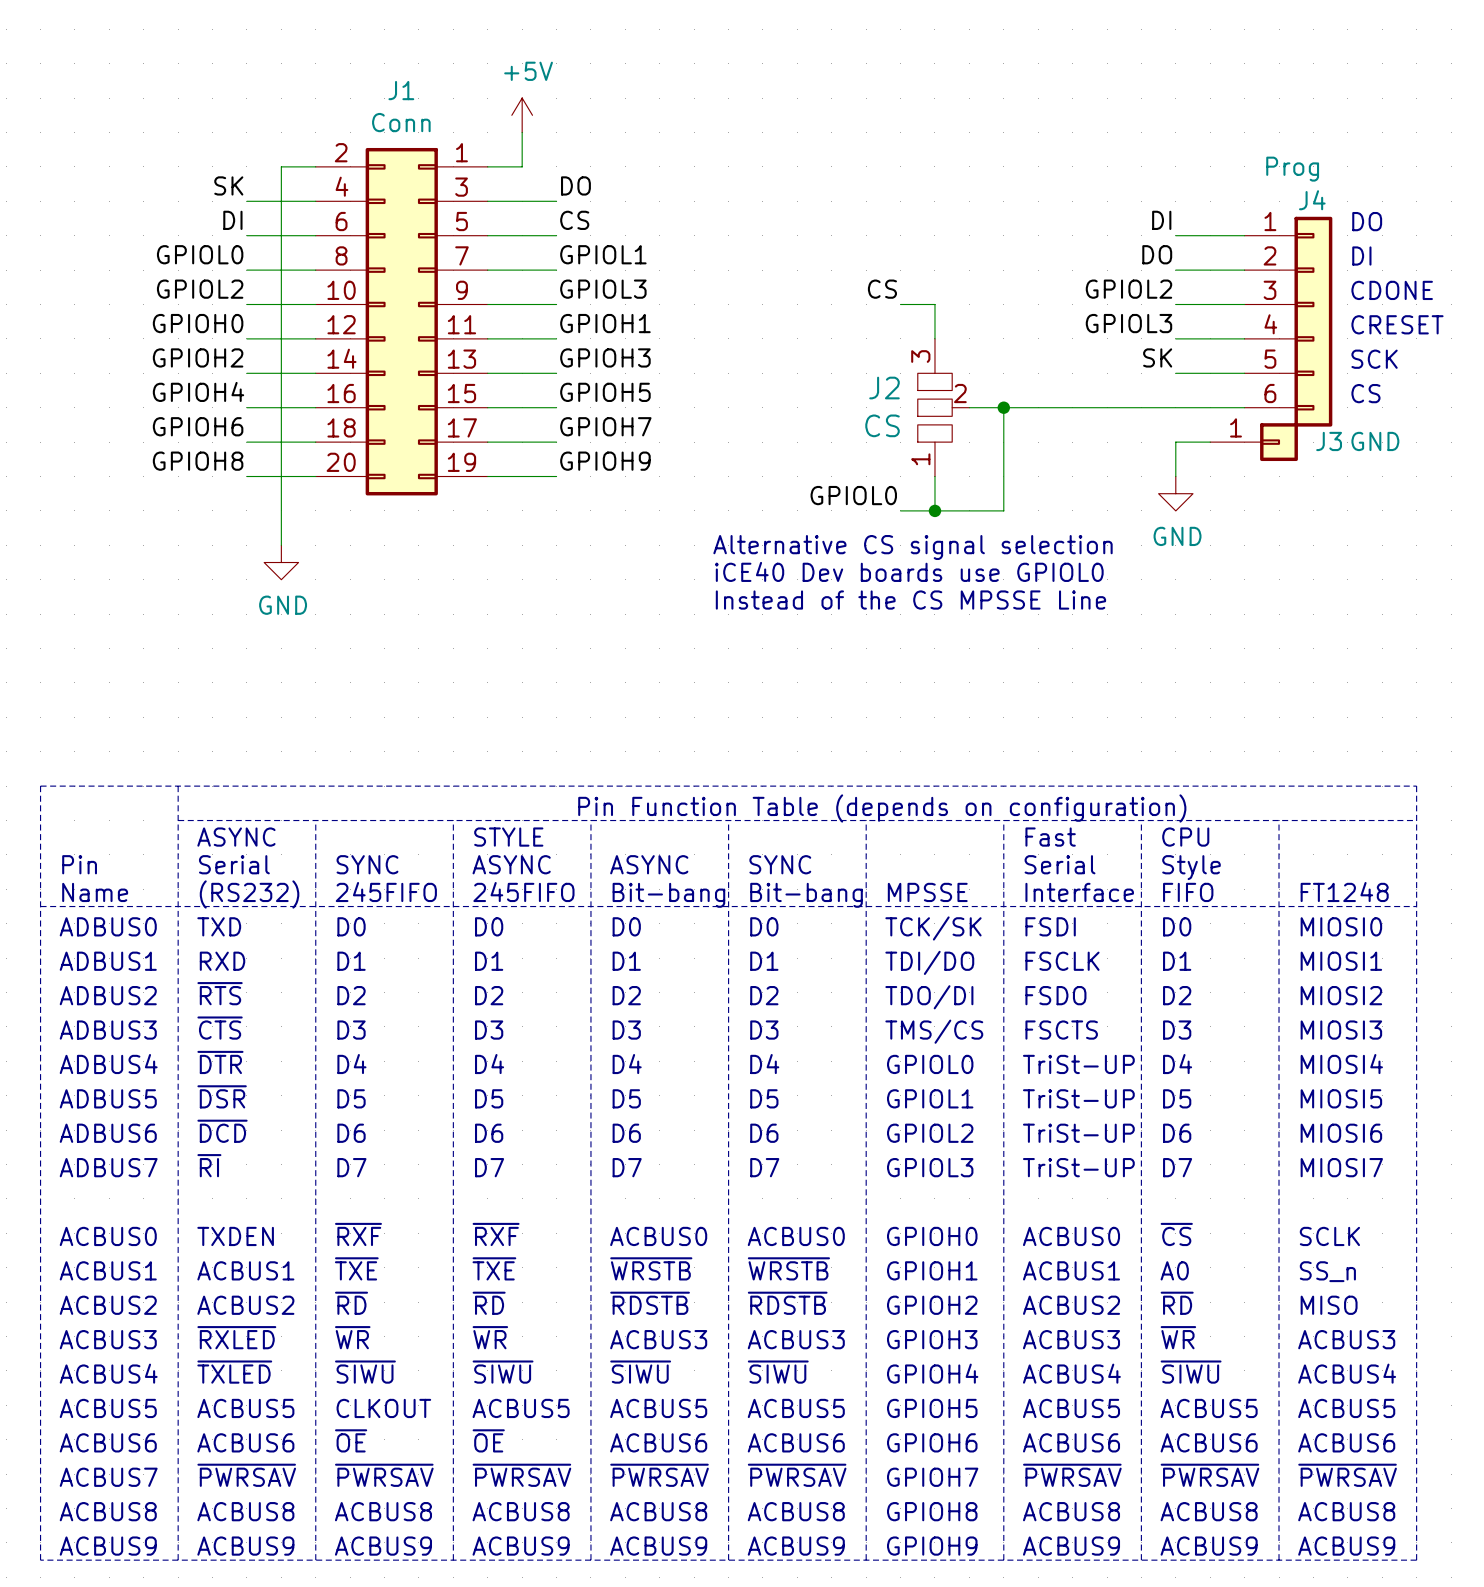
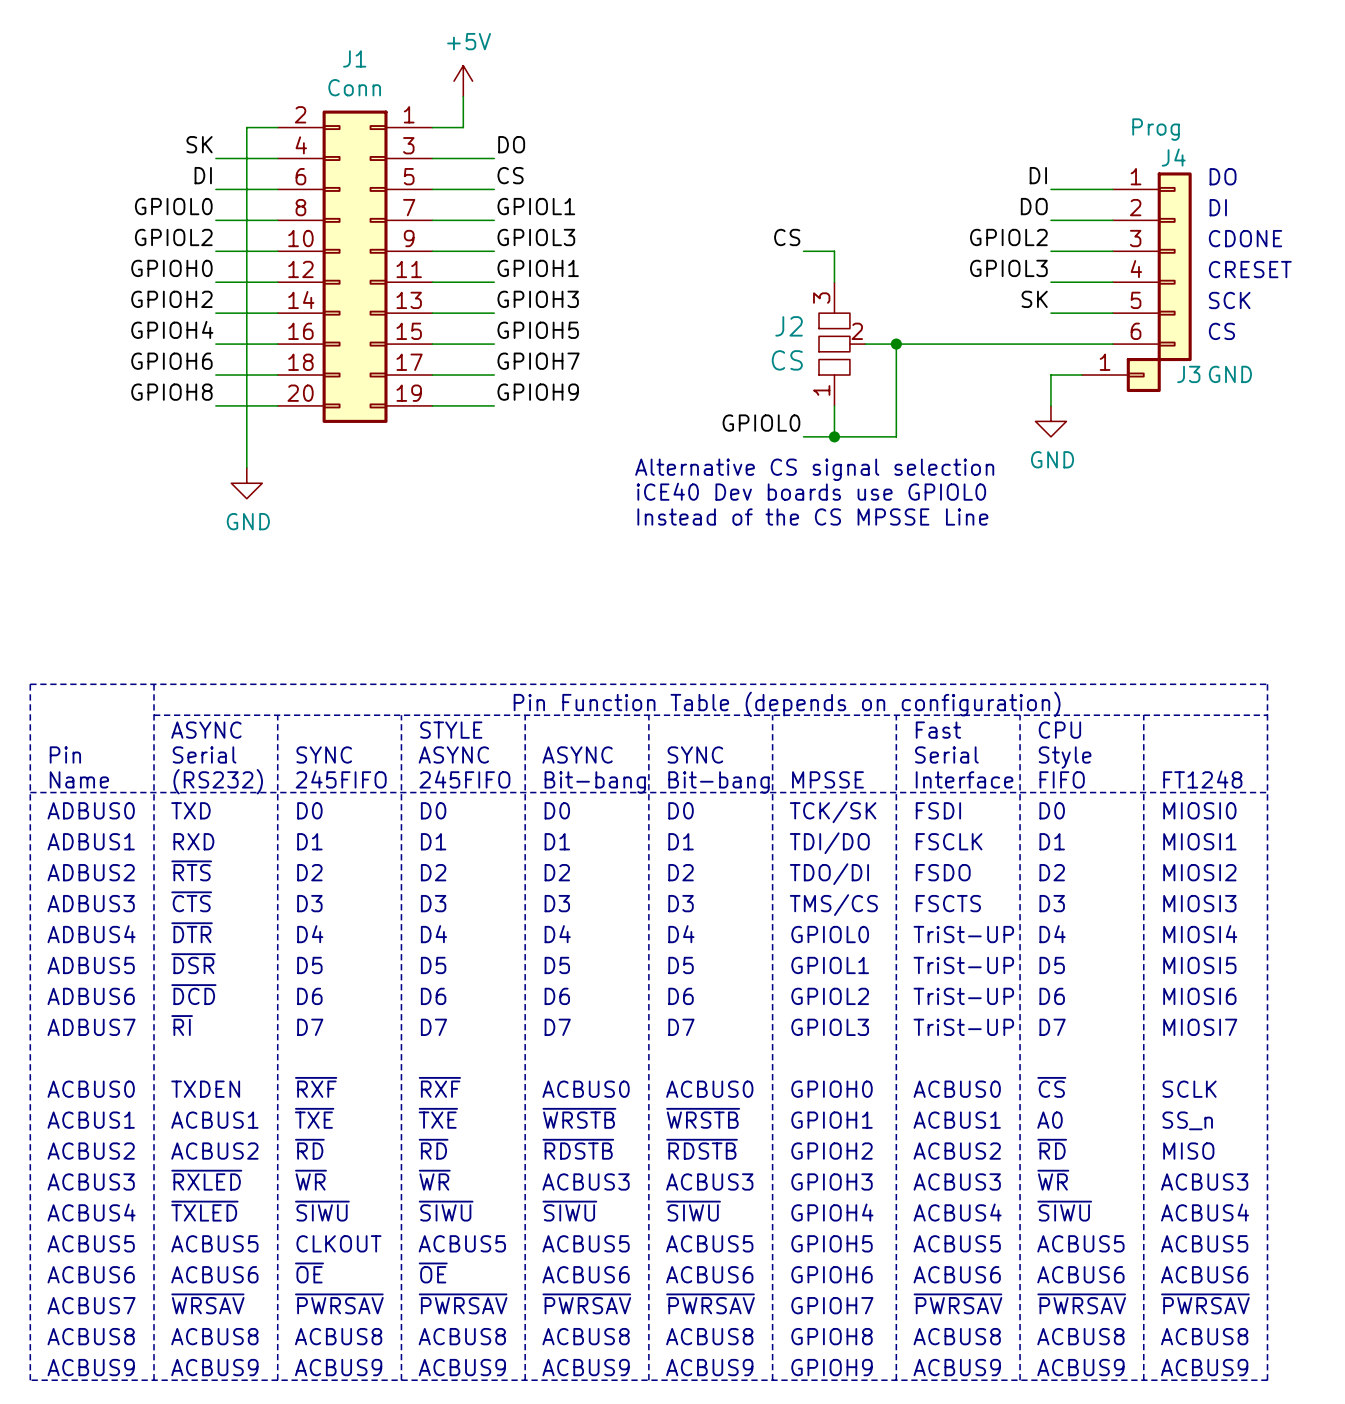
text: ~{PWRSAV} (246, 1475) -> ~{WRSAV} (207, 1303)

